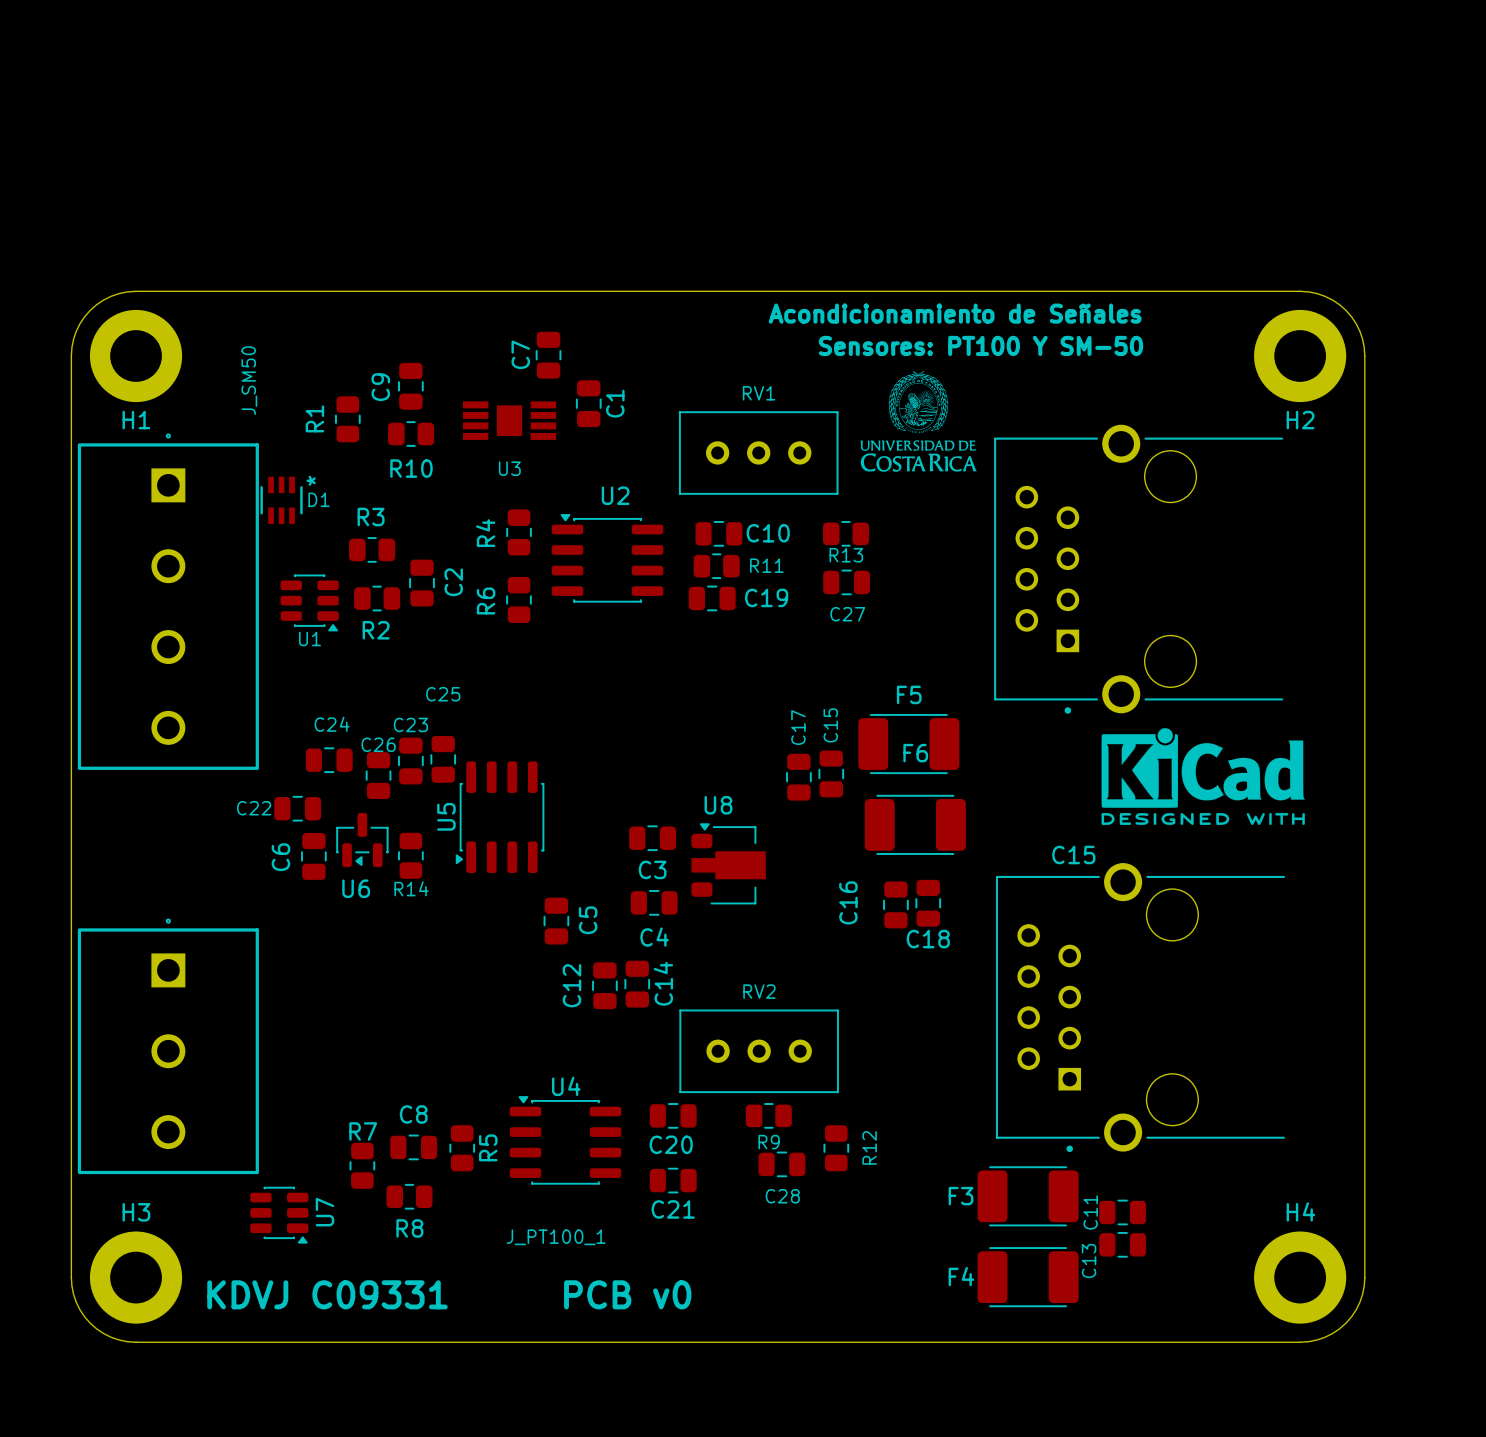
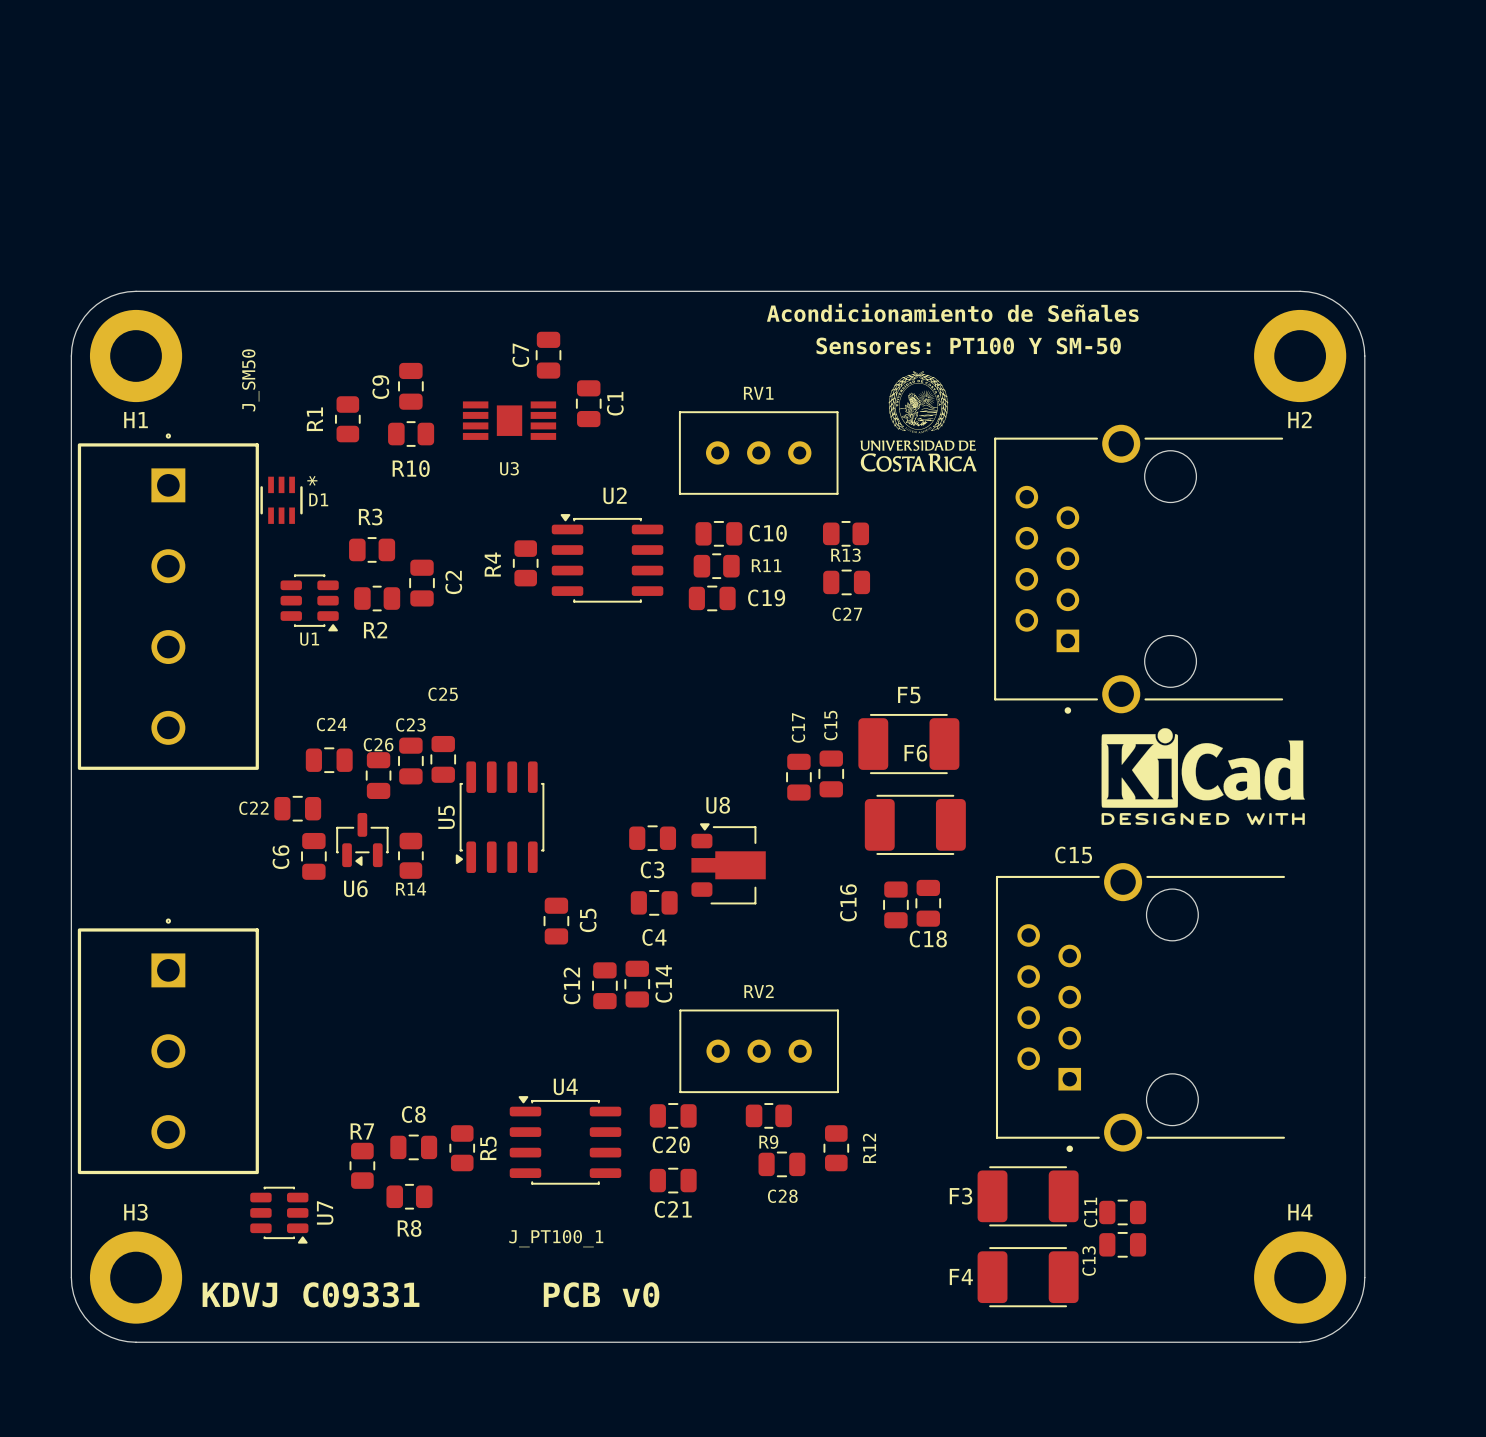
R4 position: (519, 532) -> (525, 563)
R6: (519, 599) -> none

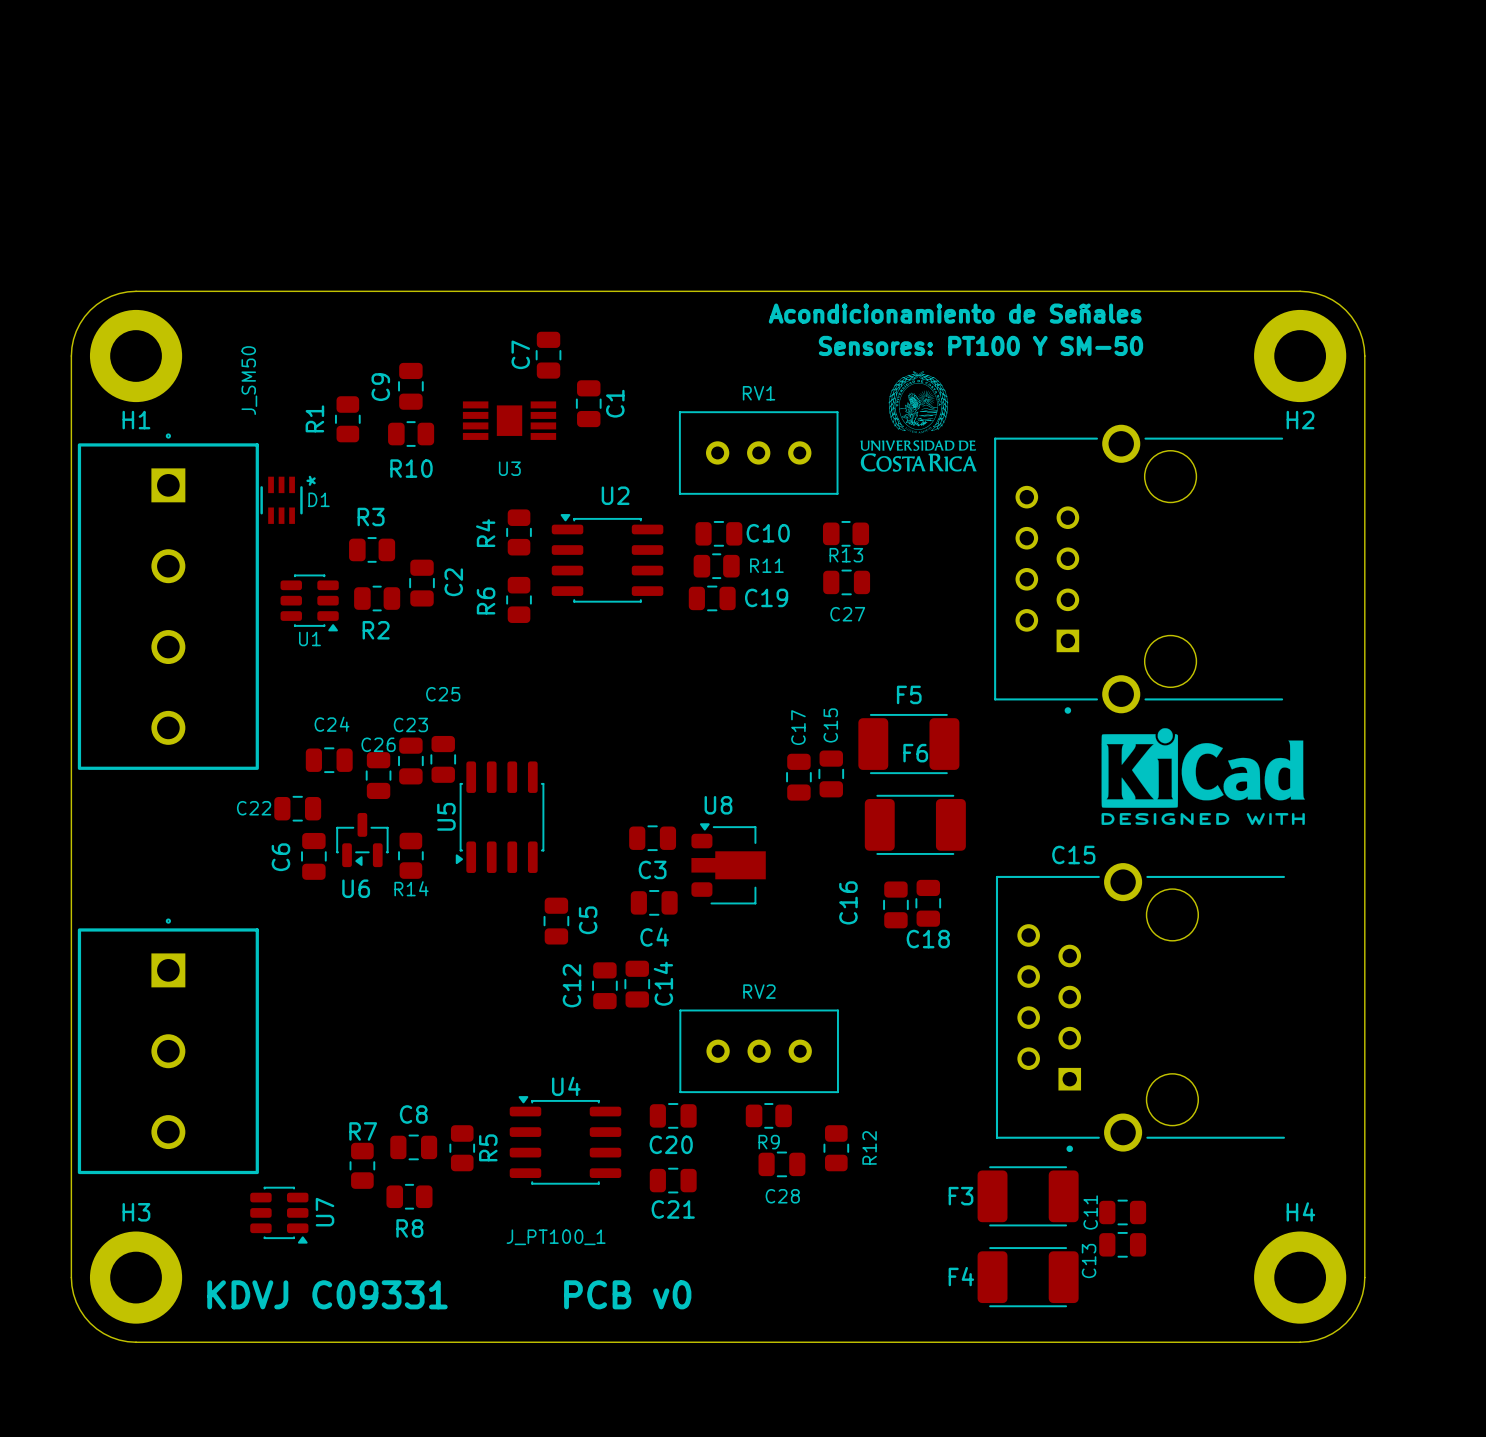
R4 position: (525, 563) -> (519, 532)
R6: none -> (519, 599)

